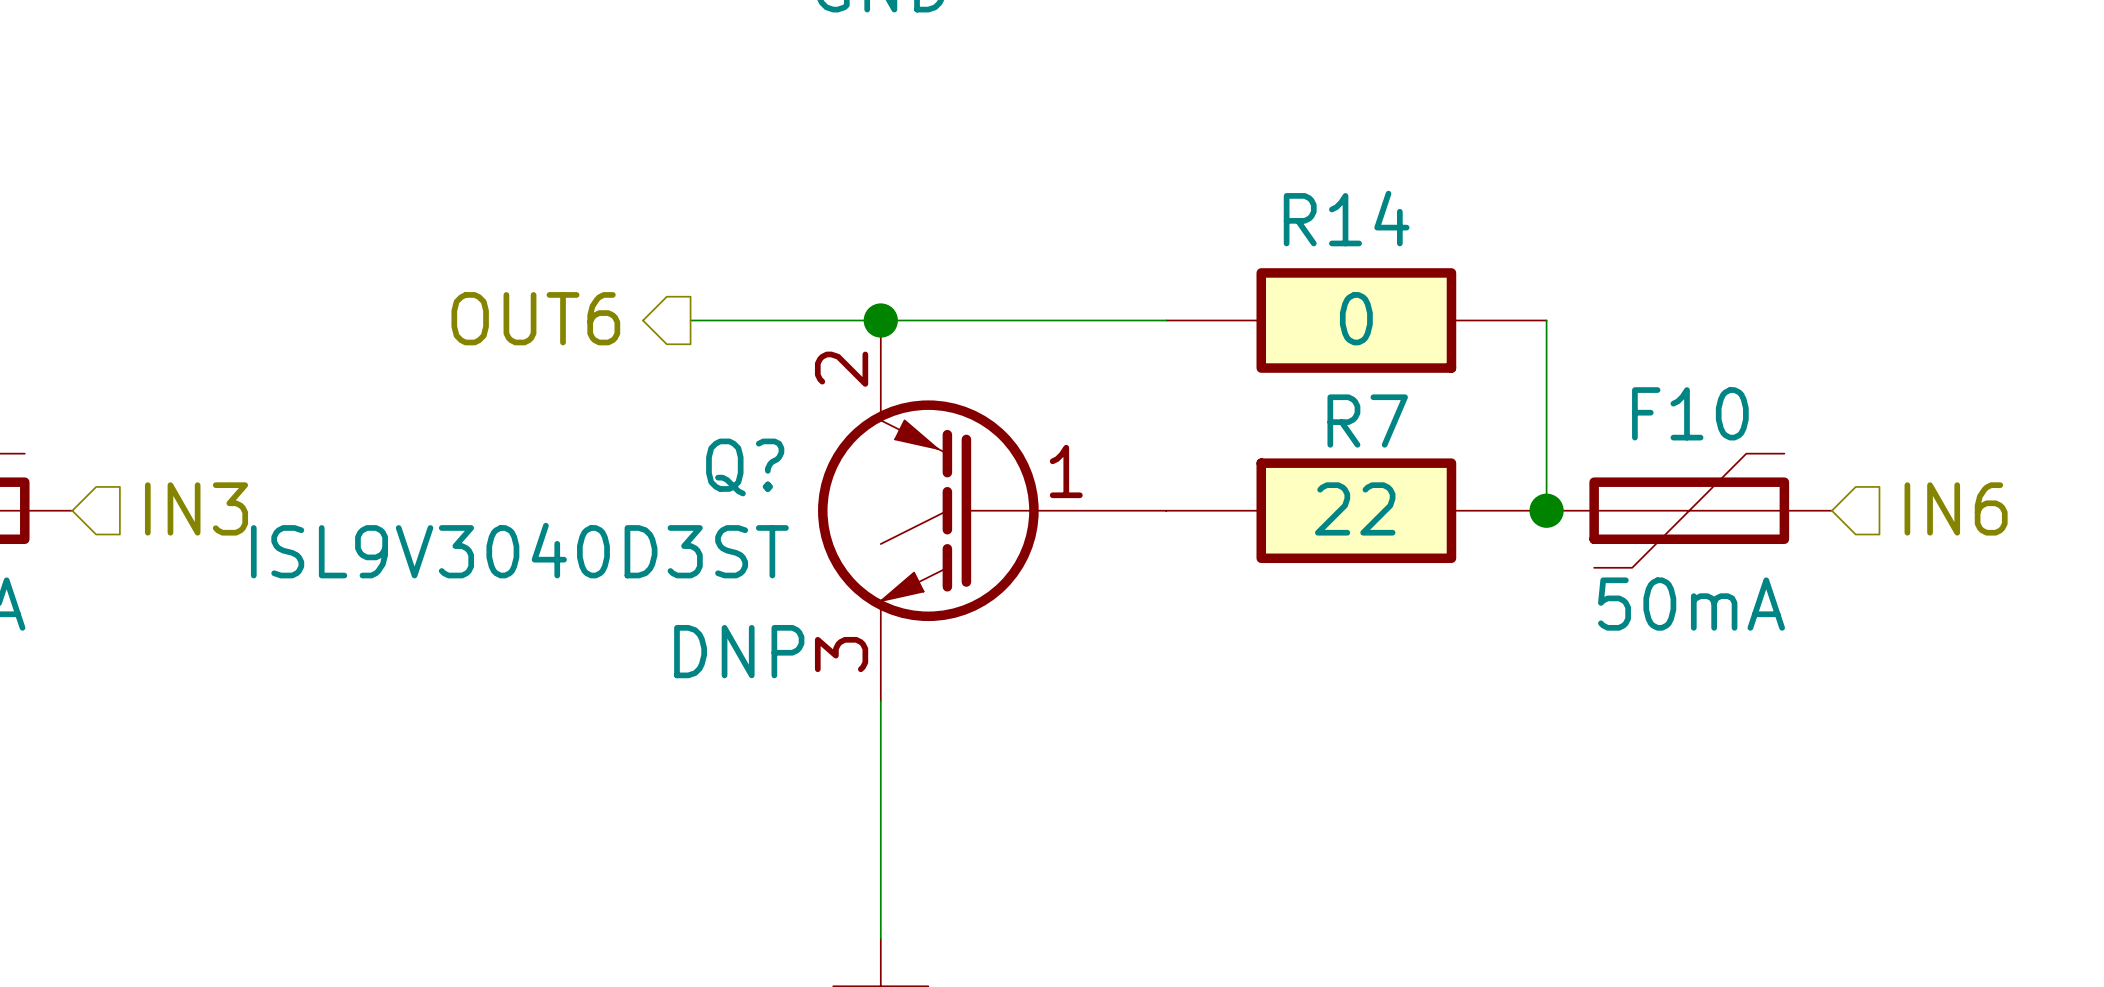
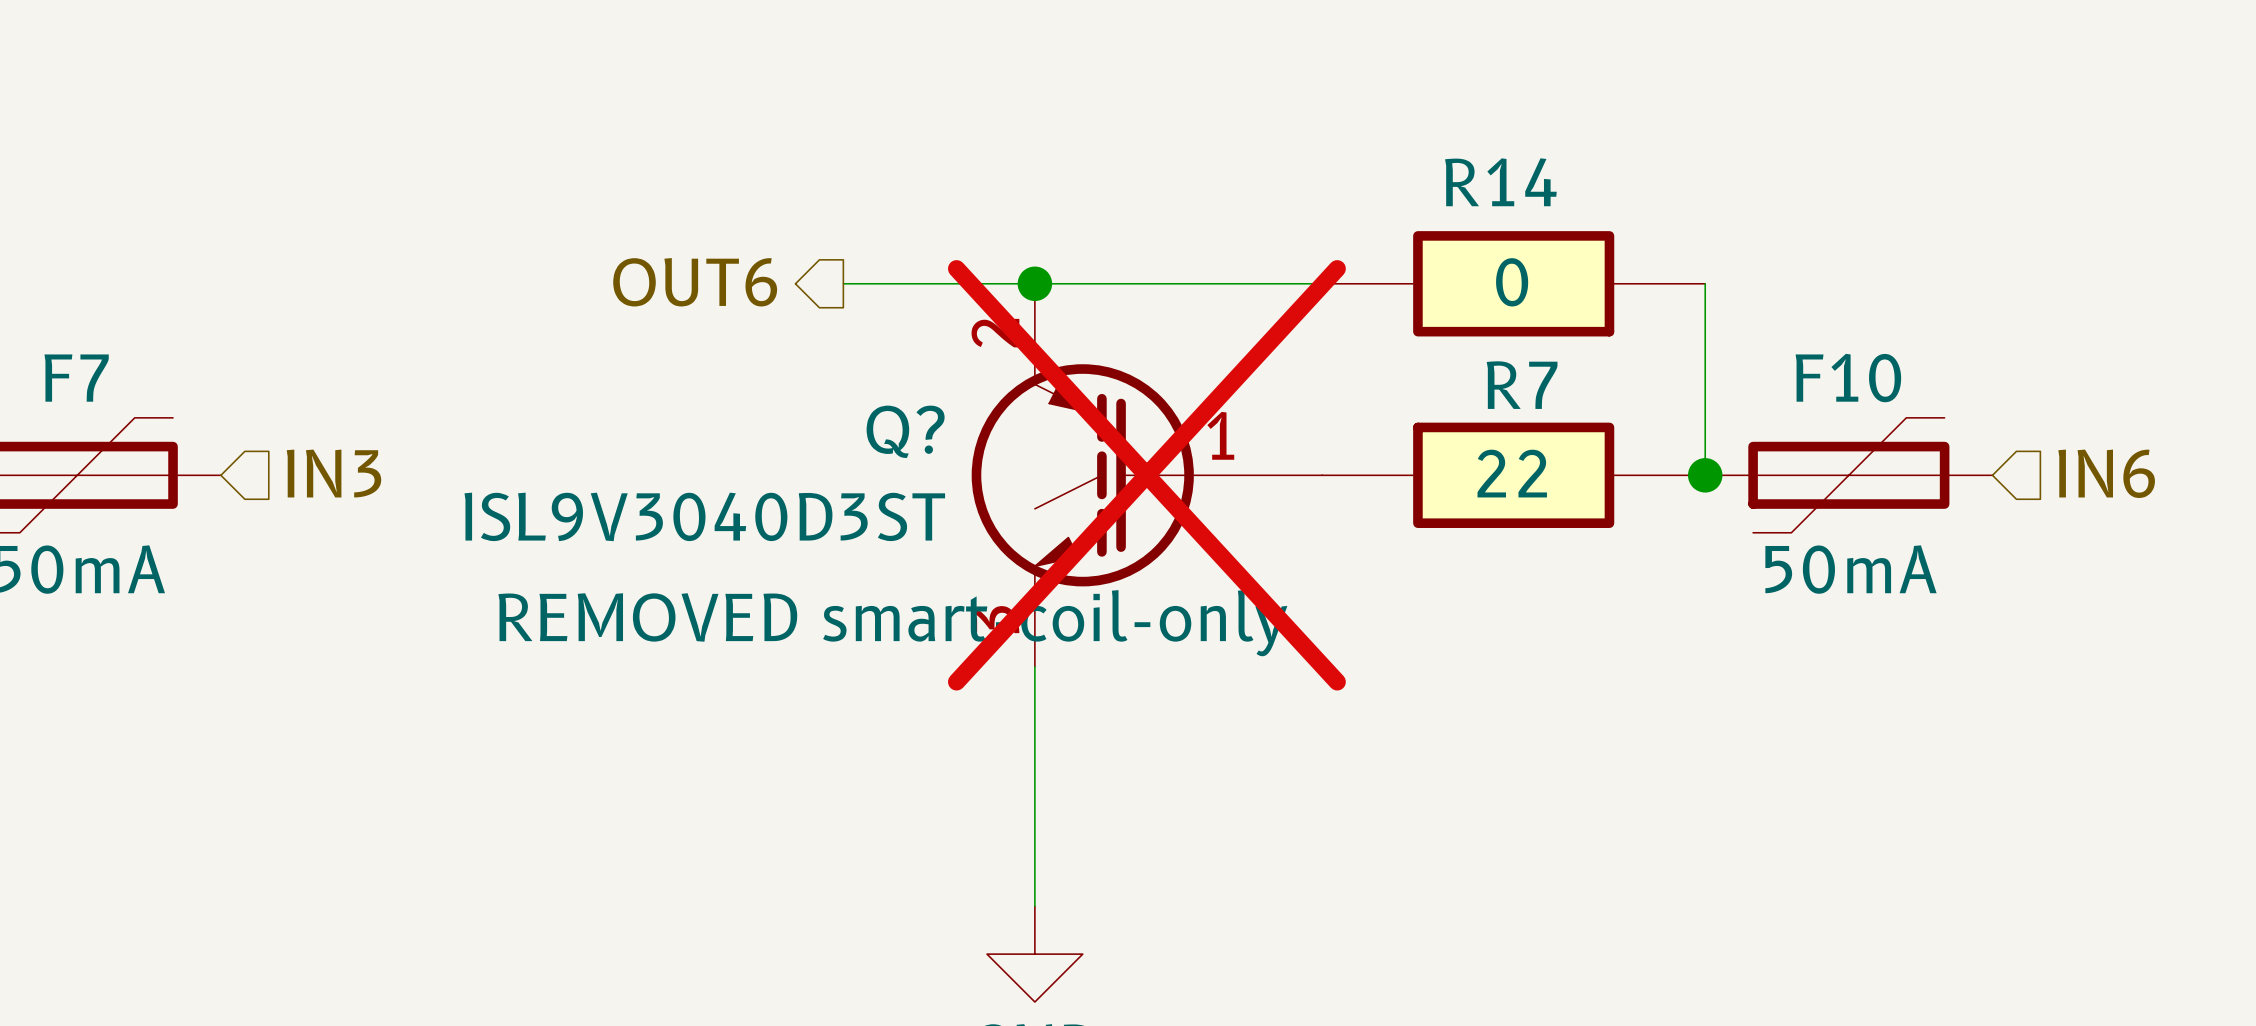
Q? do-not-place cross: none -> (1146, 475)
Q? text: DNP (739, 651) -> REMOVED smart-coil-only (892, 623)

